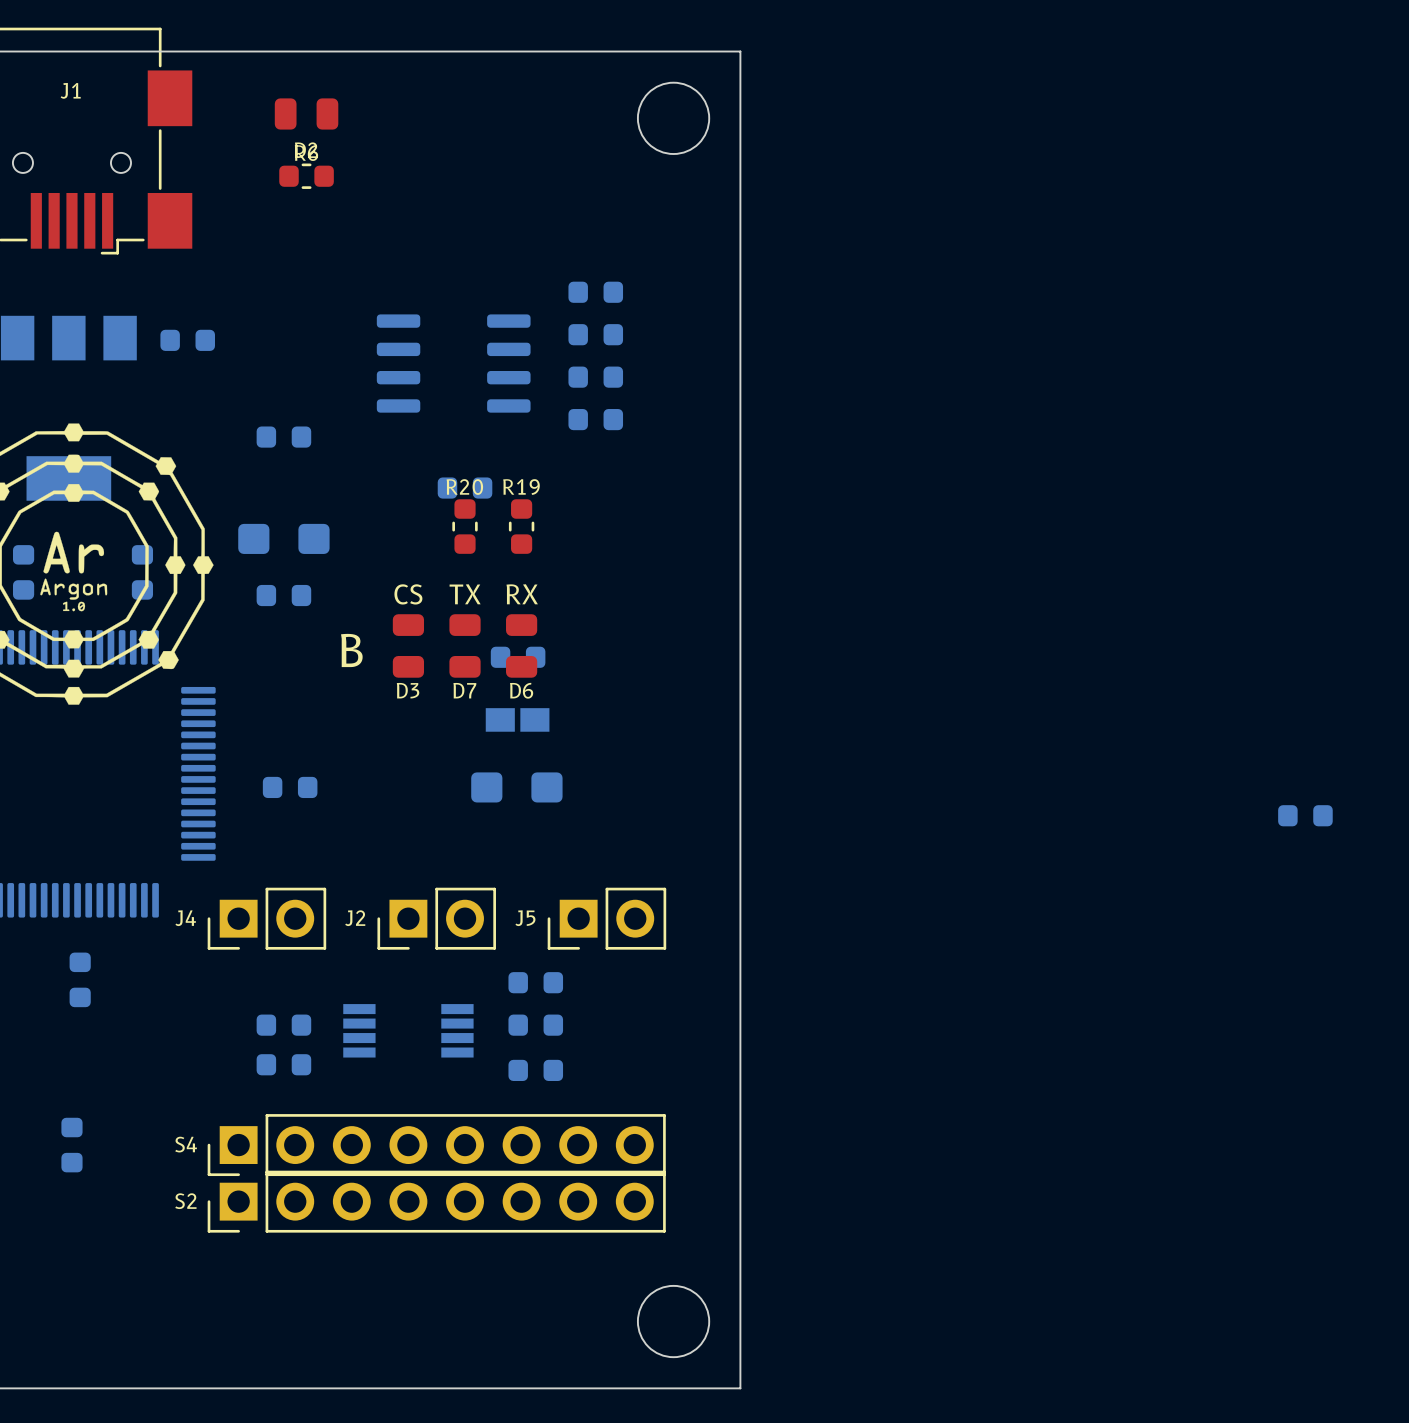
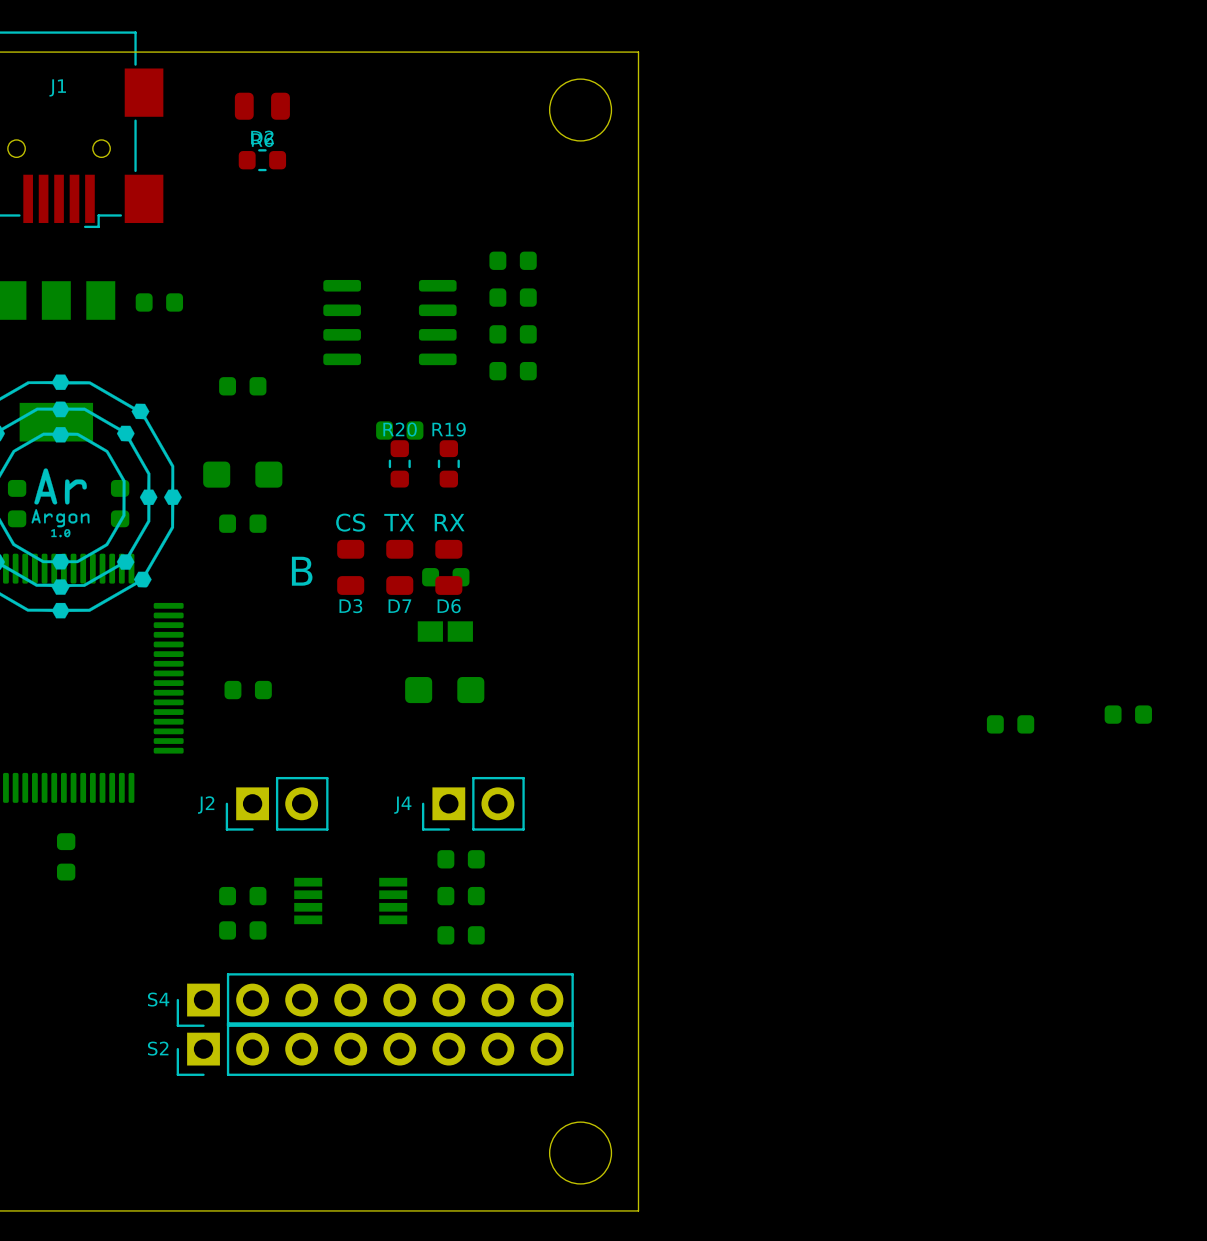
part: none -> (1010, 724)
J4 position: (266, 918) -> (473, 803)
J2 position: (436, 918) -> (277, 803)
J5: (606, 918) -> none
part: (71, 1145) -> none

